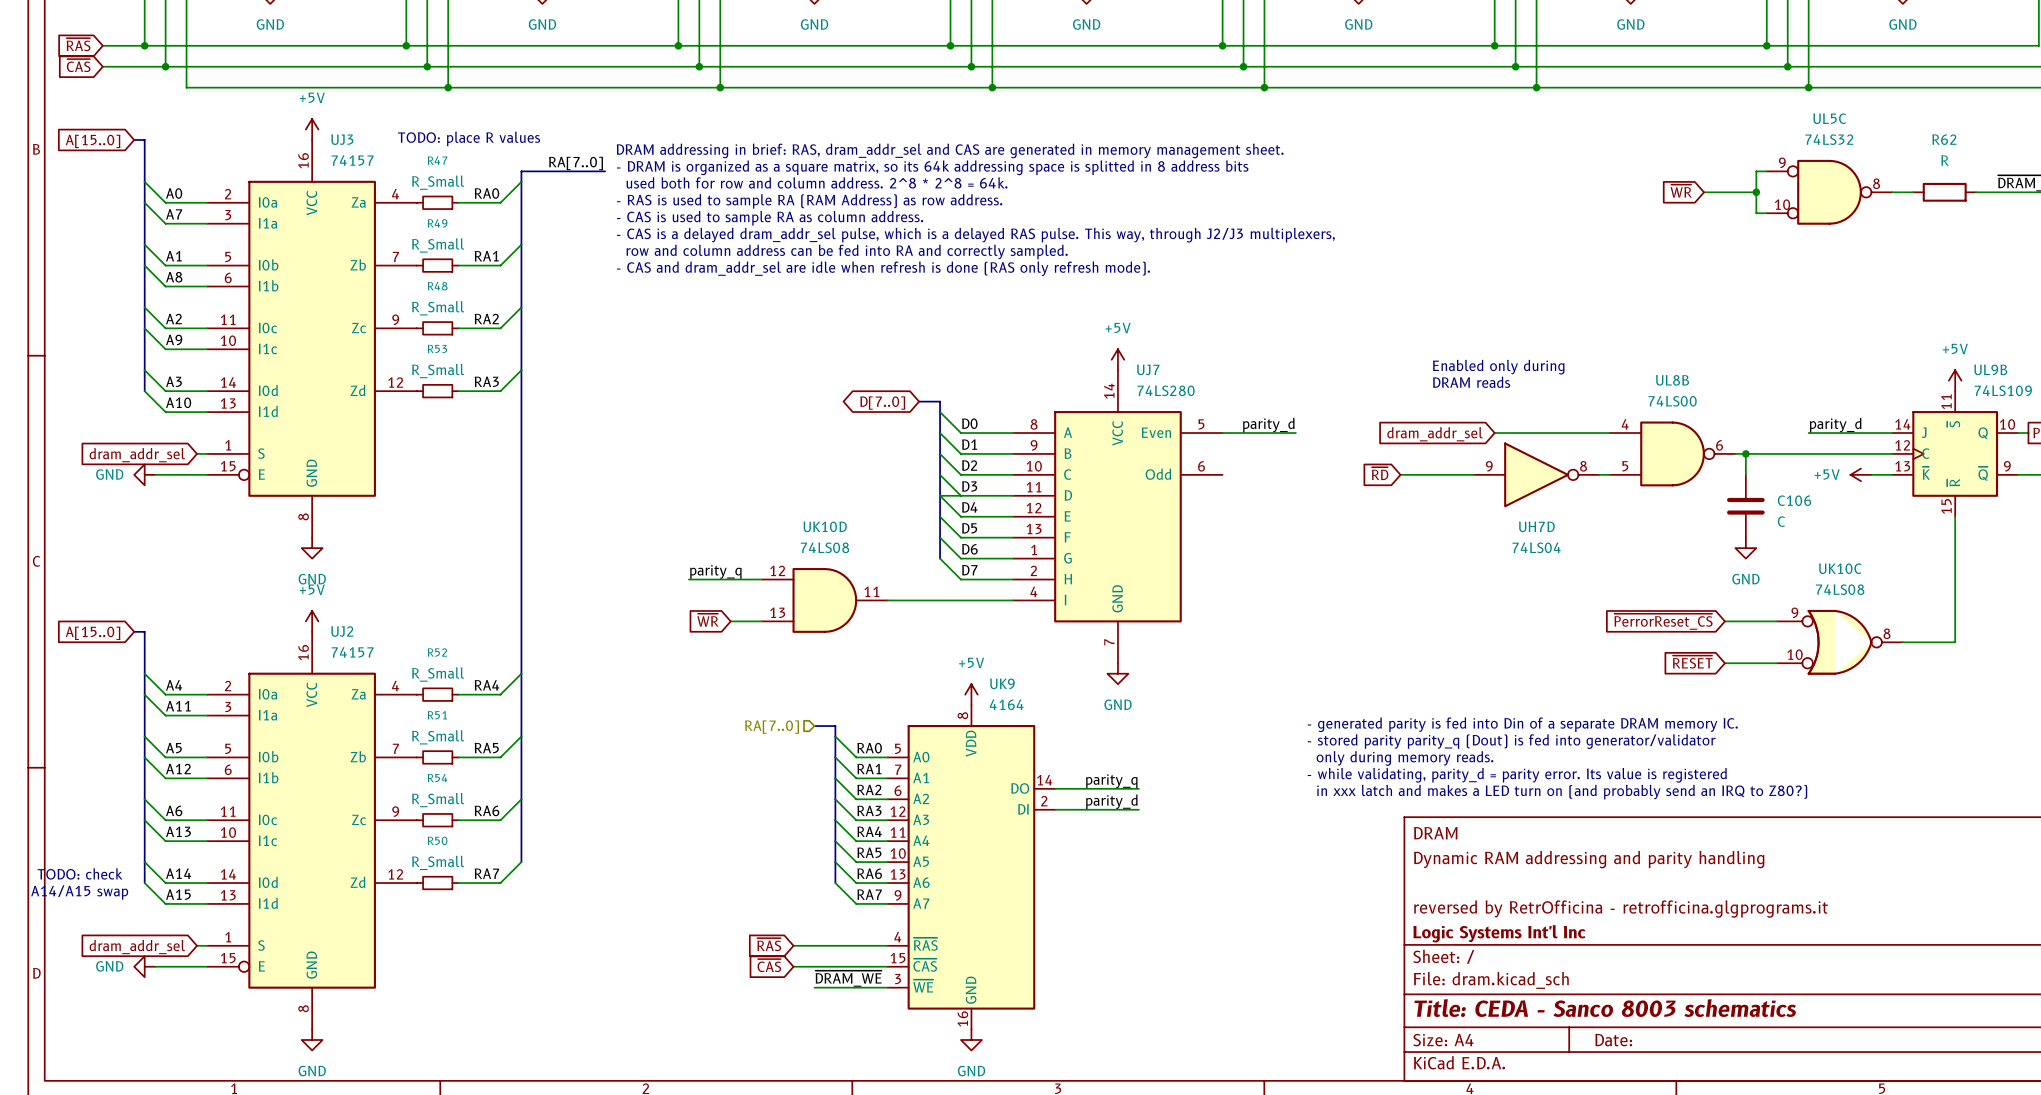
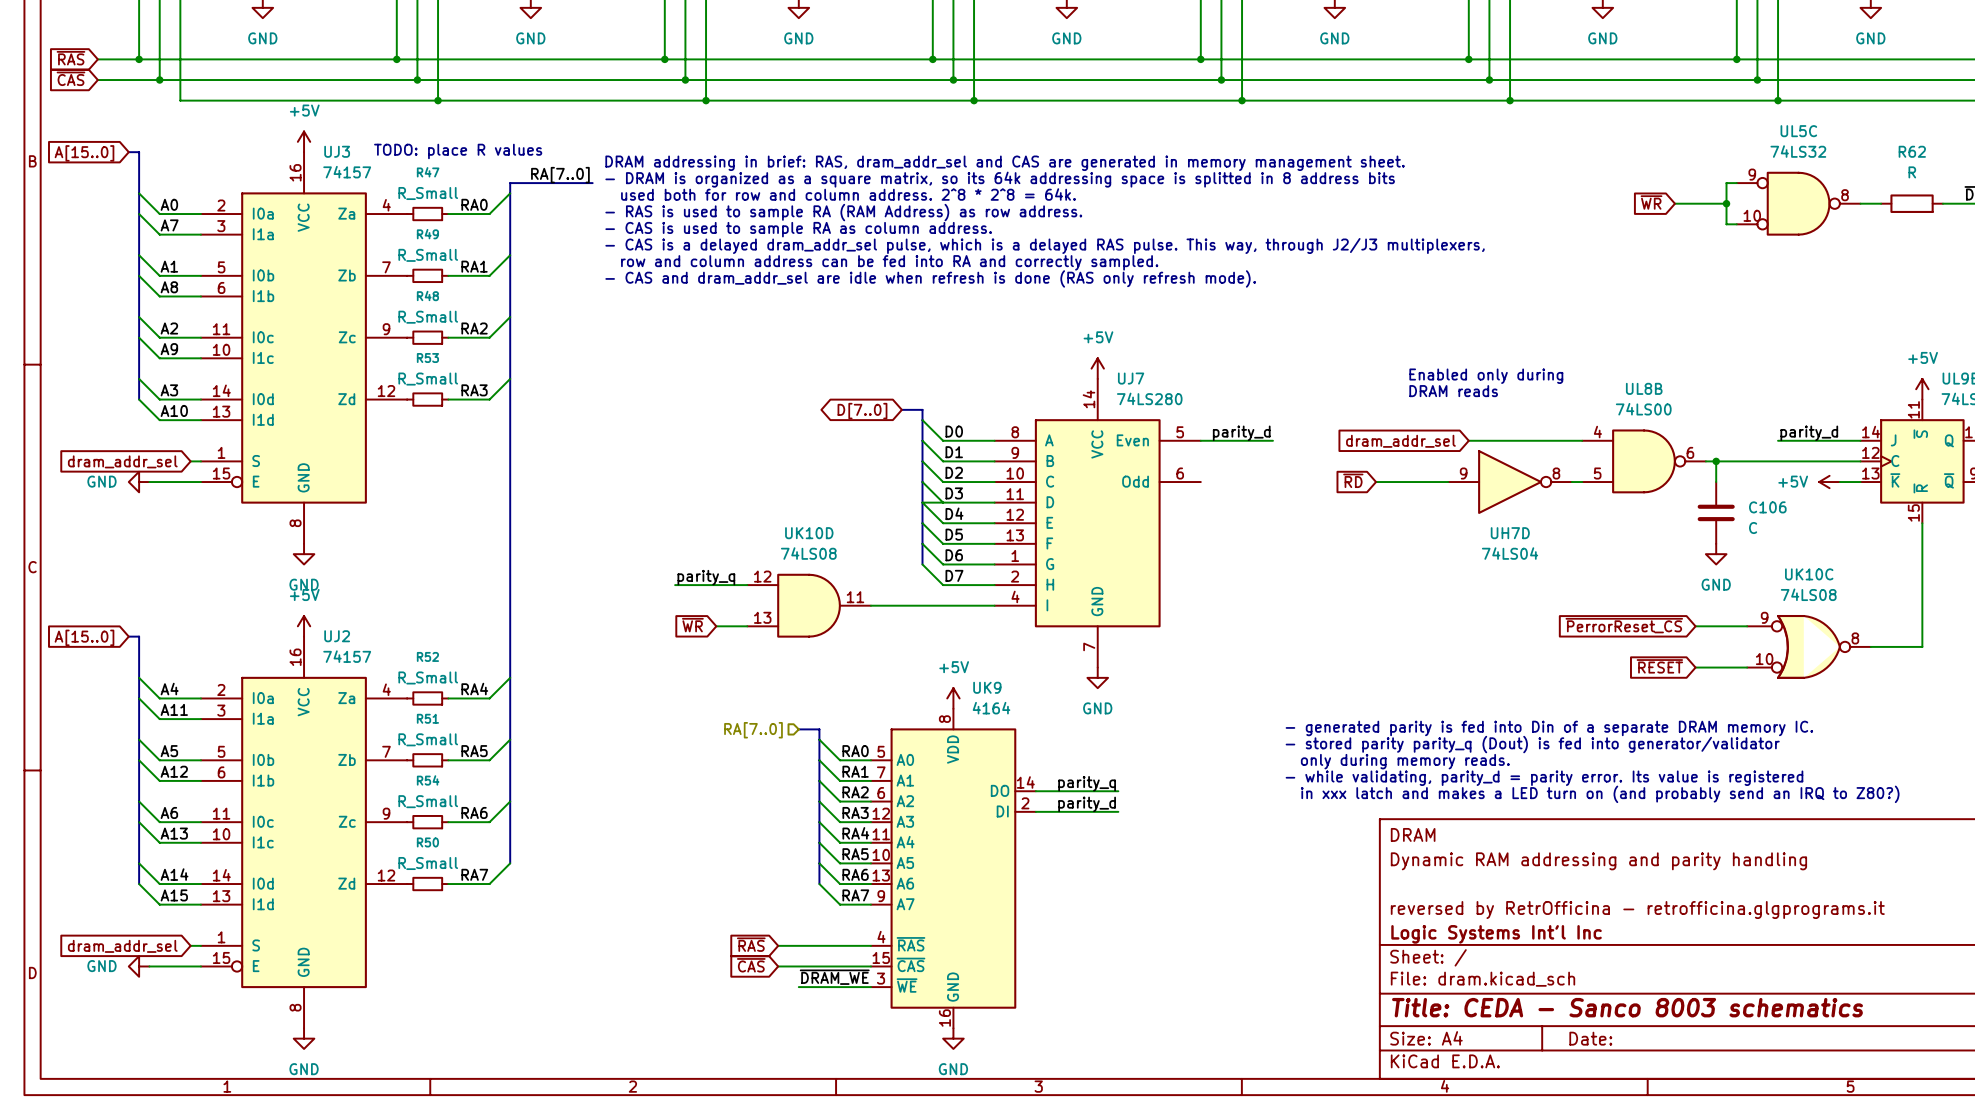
text: TODO: check (80, 873) -> none
text: A14/A15 swap (79, 892) -> none

